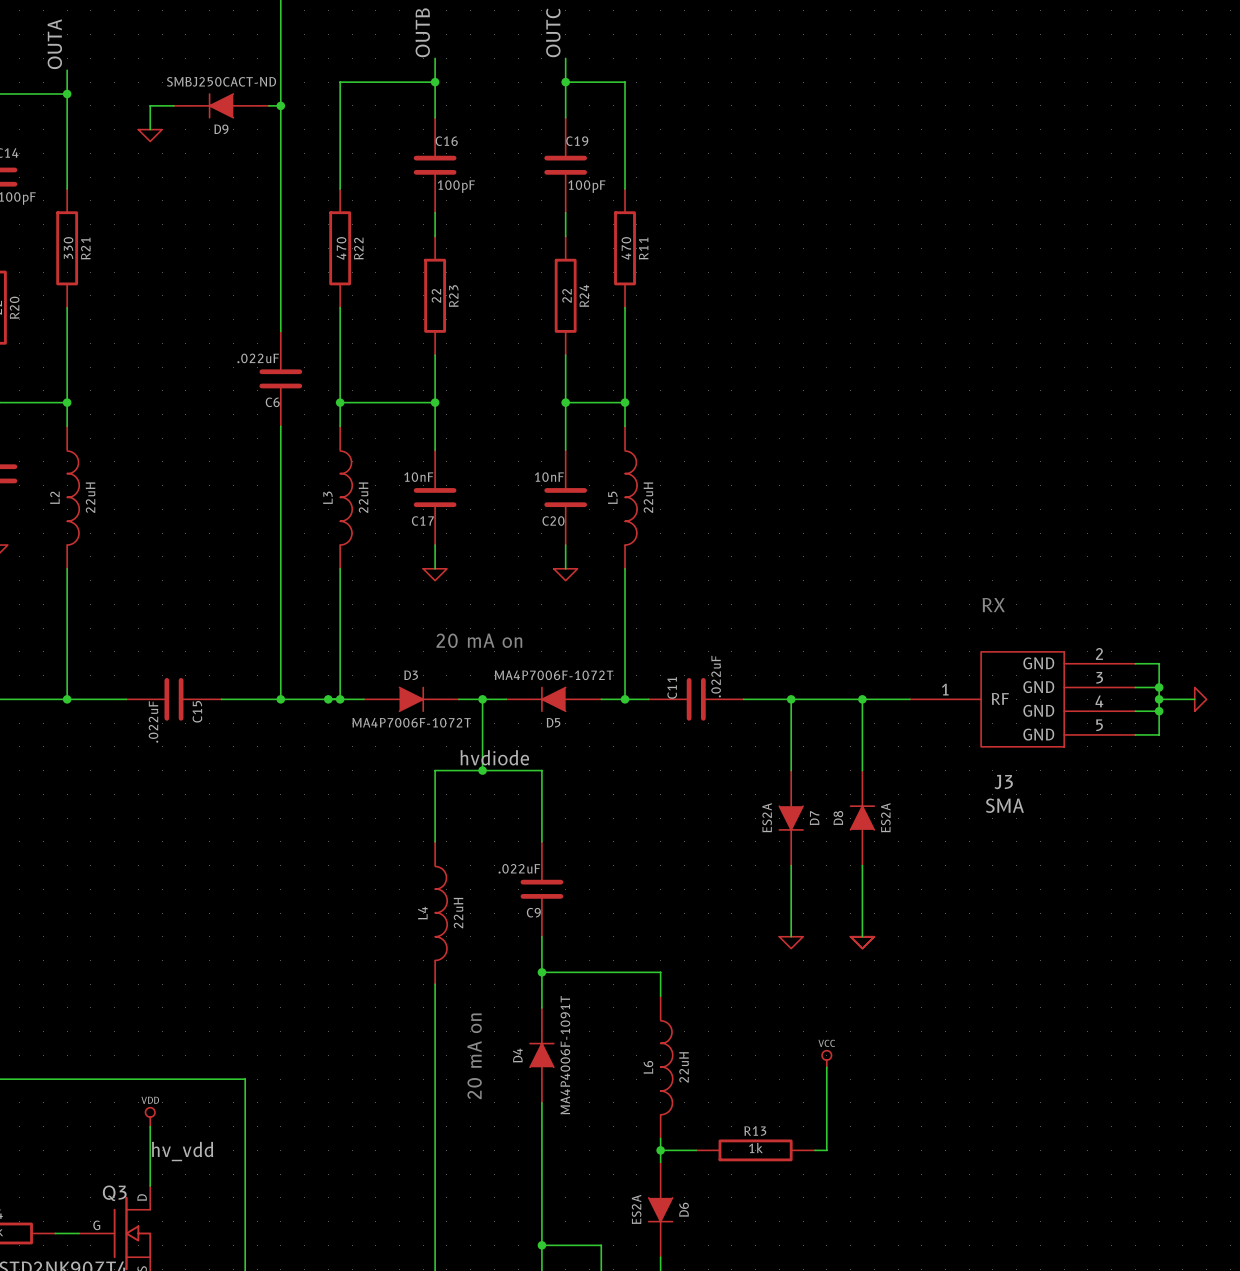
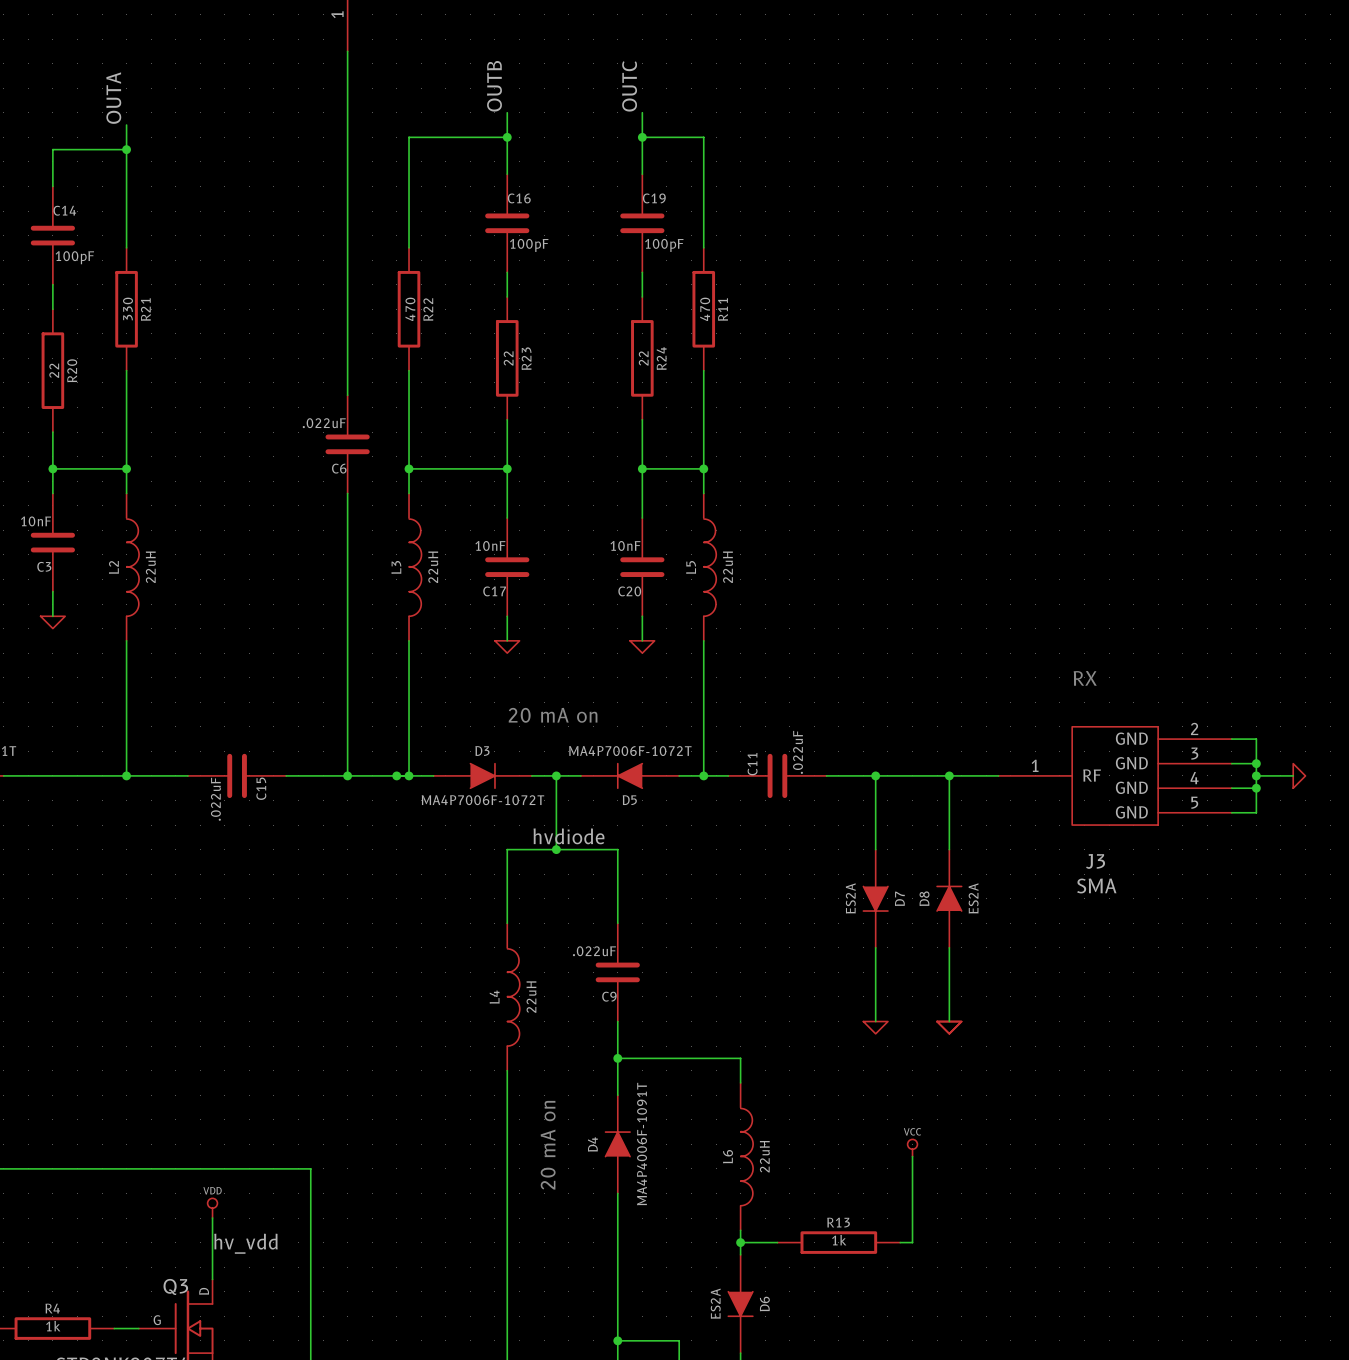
wire: (173, 105) (150, 105) (150, 129) -> none
D9: SMBJ250CACT-ND (221, 105) -> none
wire: (268, 105) (280, 105) -> none
junction: (280, 105) -> none
power symbol: (150, 135) -> none

